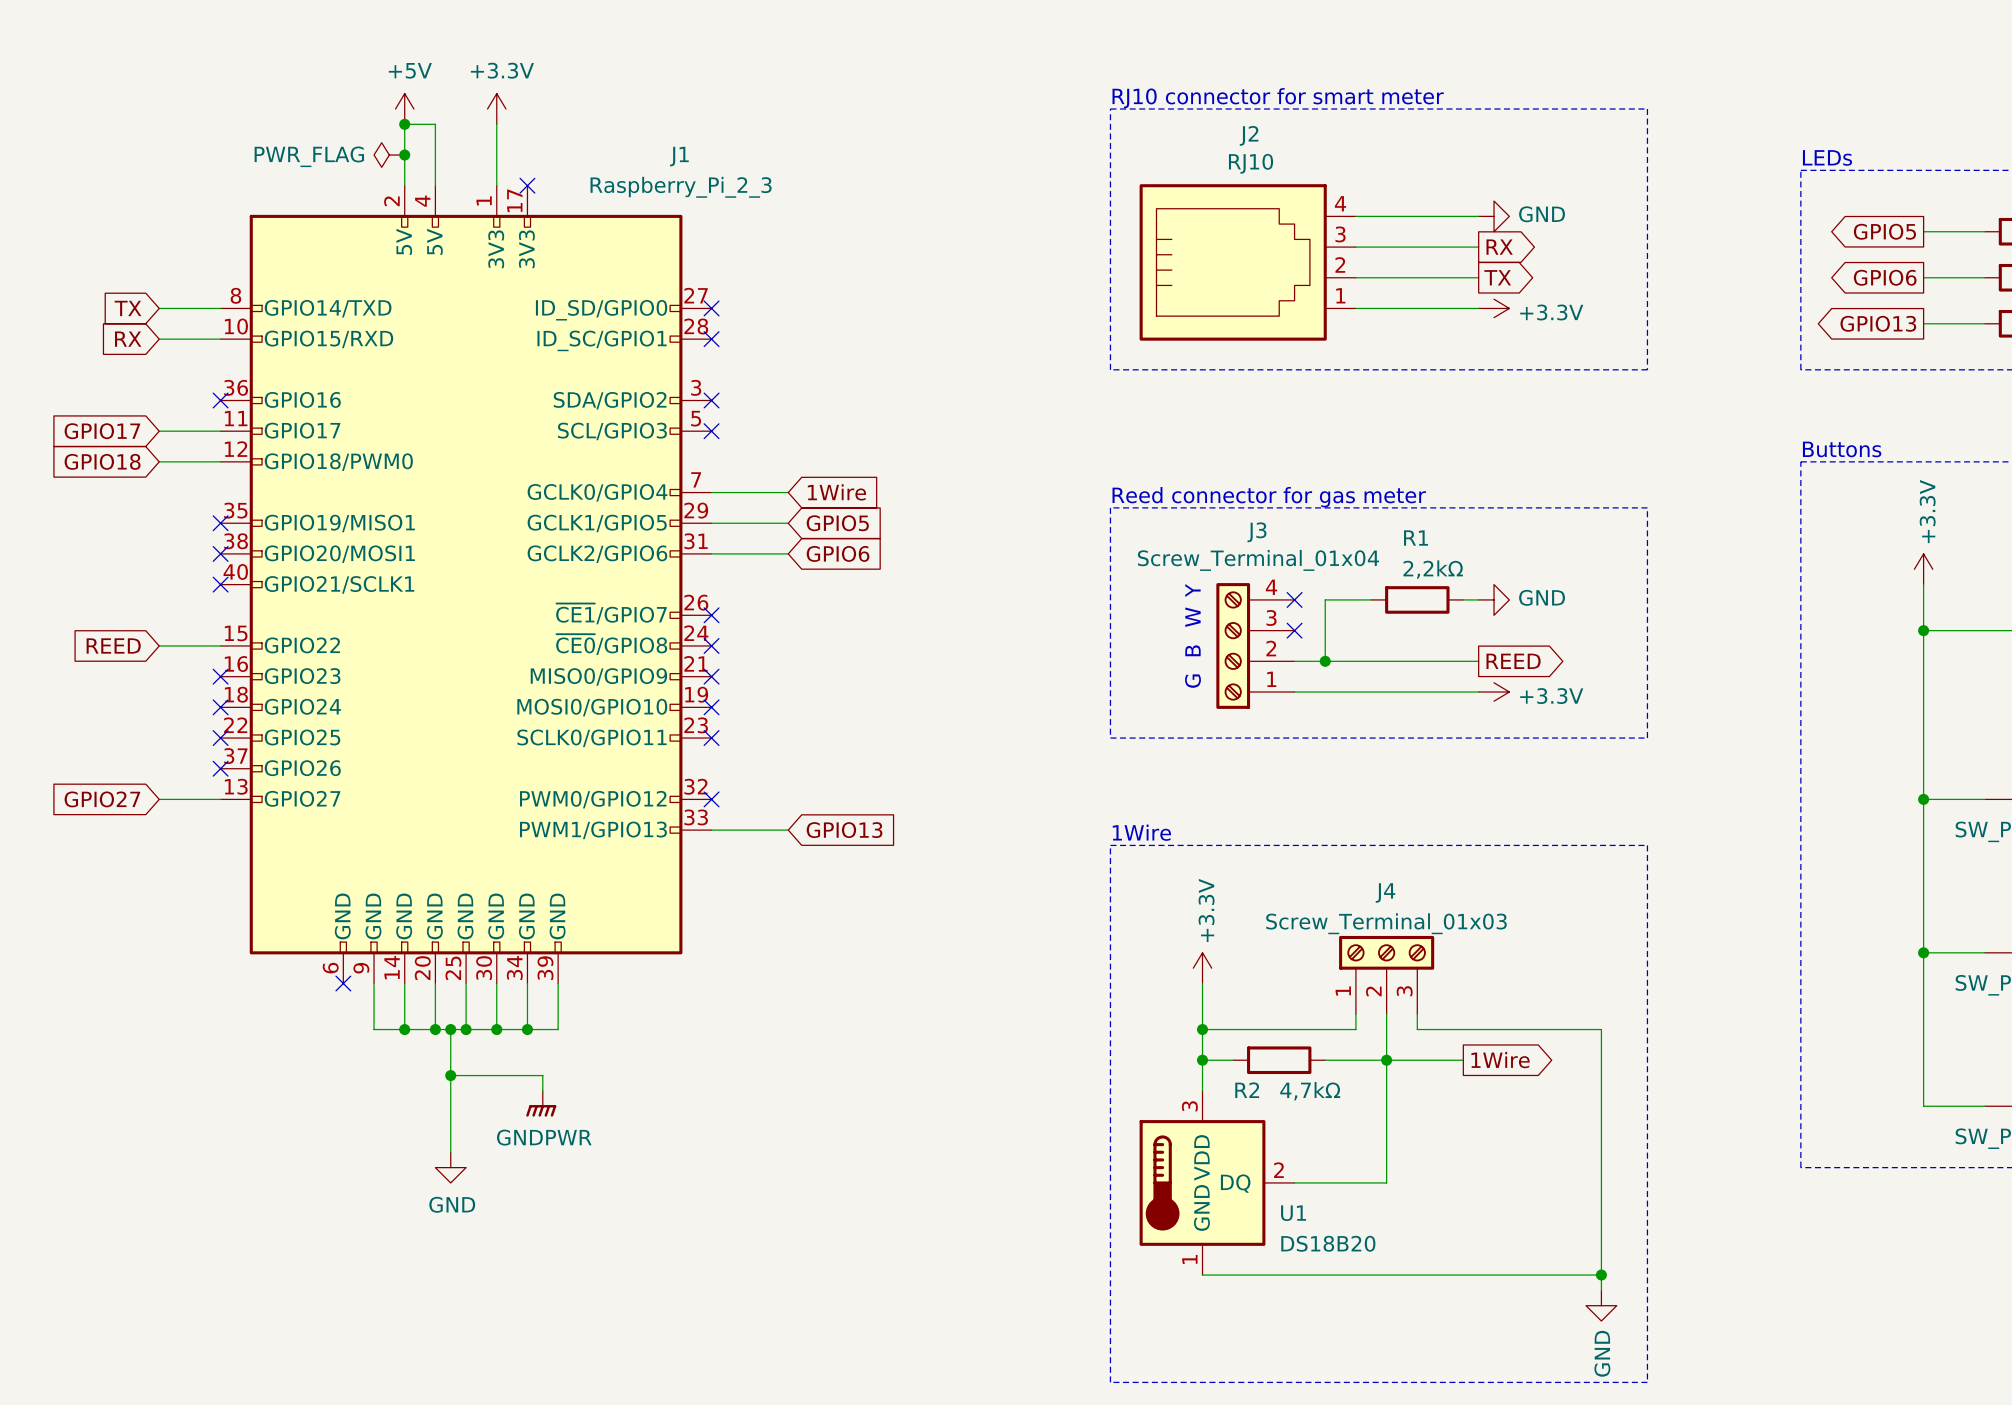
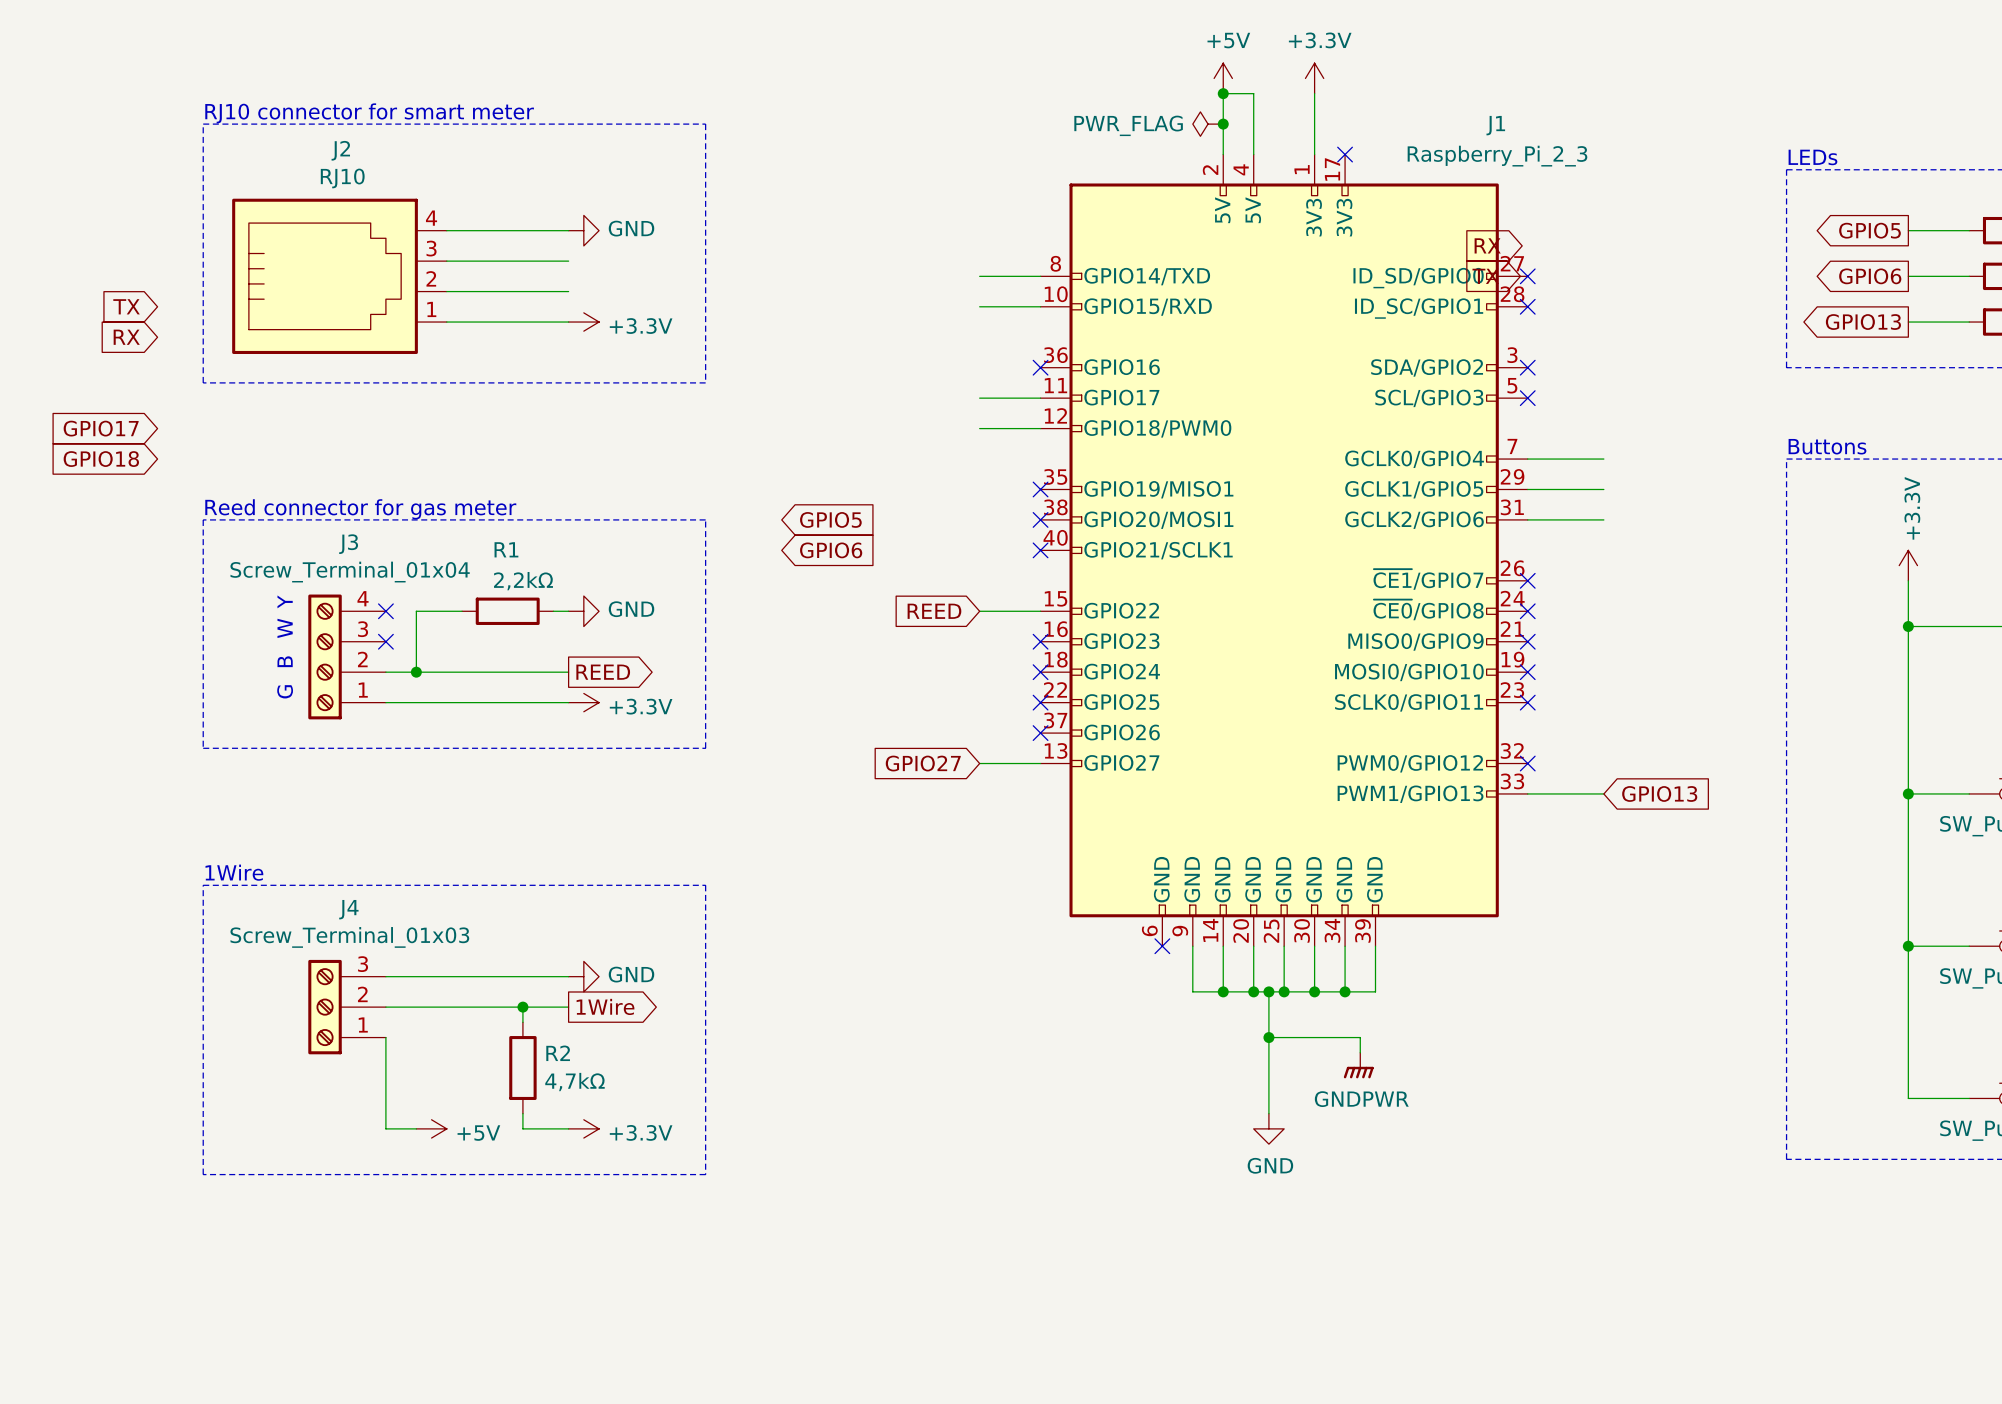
power symbol text position: +3.3V (502, 70) -> +3.3V (641, 326)
power symbol: none -> +5V (1223, 78)
junction: none -> (1223, 93)
wire: none -> (1314, 93) (1314, 154)
text: RJ10 connector for smart meter (1278, 98) -> none
power symbol: +5V (404, 109) -> none
power symbol rotation: 0° (496, 109) -> 90° clockwise (583, 322)
power symbol position: +3.3V (496, 109) -> +3.3V (583, 322)
line: (1110, 109) (1647, 109) (1647, 369) (1110, 369) (1110, 109) -> none
text: none -> RJ10 connector for smart meter (369, 113)
line: none -> (203, 124) (705, 124) (705, 382) (203, 382) (203, 124)
junction: (404, 124) -> none
wire: (496, 124) (496, 185) -> none
power symbol: none -> PWR_FLAG (1208, 124)
junction: none -> (1223, 124)
power symbol: PWR_FLAG (389, 155) -> none
junction: (404, 155) -> none
wire: none -> (1223, 154) (1223, 93) (1253, 93) (1253, 154)
no-connect mark: none -> (1345, 154)
wire: (404, 185) (404, 124) (435, 124) (435, 185) -> none
no-connect mark: (527, 185) -> none
power symbol: GND (1494, 216) -> none
power symbol: none -> GND (583, 230)
J2 position: (1247, 262) -> (339, 276)
wire: none -> (979, 276) (1040, 276)
no-connect mark: none -> (1527, 276)
wire: (159, 308) (220, 308) -> none
no-connect mark: (711, 308) -> none
wire: none -> (979, 306) (1040, 306)
power symbol rotation: 0° (1494, 308) -> 90° counterclockwise (1314, 78)
power symbol position: +3.3V (1494, 308) -> +3.3V (1314, 78)
no-connect mark: none -> (1527, 306)
power symbol text position: +3.3V (1551, 312) -> +3.3V (1320, 40)
wire: (159, 339) (220, 339) -> none
no-connect mark: (711, 339) -> none
no-connect mark: none -> (1040, 367)
no-connect mark: none -> (1527, 367)
no-connect mark: (220, 400) -> none
no-connect mark: (711, 400) -> none
wire: none -> (979, 398) (1040, 398)
no-connect mark: none -> (1527, 398)
wire: (159, 431) (220, 431) -> none
no-connect mark: (711, 431) -> none
wire: none -> (979, 428) (1040, 428)
wire: (159, 461) (220, 461) -> none
wire: none -> (1527, 459) (1603, 459)
wire: (711, 492) (788, 492) -> none
global label: 1Wire (836, 492) -> none
no-connect mark: none -> (1040, 489)
wire: none -> (1527, 489) (1603, 489)
text: Reed connector for gas meter (1269, 497) -> none
line: (1110, 507) (1110, 738) (1647, 738) (1647, 507) (1110, 507) -> none
text: none -> Reed connector for gas meter (360, 509)
line: none -> (203, 519) (203, 748) (705, 748) (705, 519) (203, 519)
no-connect mark: (220, 523) -> none
wire: (711, 523) (788, 523) -> none
no-connect mark: none -> (1040, 519)
wire: none -> (1527, 519) (1603, 519)
no-connect mark: (220, 553) -> none
wire: (711, 553) (788, 553) -> none
no-connect mark: none -> (1040, 550)
no-connect mark: (220, 584) -> none
J1 position: (466, 584) -> (1284, 550)
no-connect mark: none -> (1527, 580)
text: Y (1192, 590) -> none
no-connect mark: (1294, 599) -> none
R1 position: (1417, 599) -> (507, 611)
power symbol: GND (1494, 599) -> none
text: none -> Y (285, 601)
no-connect mark: none -> (385, 611)
power symbol: none -> GND (583, 611)
no-connect mark: (711, 615) -> none
global label: none -> REED (934, 611)
wire: none -> (979, 611) (1040, 611)
no-connect mark: none -> (1527, 611)
text: W (1192, 617) -> none
no-connect mark: (1294, 630) -> none
text: none -> W (285, 628)
global label: REED (113, 645) -> none
wire: (159, 645) (220, 645) -> none
no-connect mark: none -> (385, 641)
no-connect mark: (711, 645) -> none
no-connect mark: none -> (1040, 641)
J3 position: (1255, 645) -> (347, 656)
no-connect mark: none -> (1527, 641)
text: B (1192, 650) -> none
junction: (1325, 661) -> none
global label: REED (1513, 661) -> none
text: none -> B (285, 661)
no-connect mark: (220, 676) -> none
junction: none -> (416, 672)
global label: none -> REED (603, 672)
no-connect mark: (711, 676) -> none
no-connect mark: none -> (1040, 672)
no-connect mark: none -> (1527, 672)
text: G (1192, 681) -> none
power symbol: +3.3V (1494, 692) -> none
text: none -> G (285, 691)
no-connect mark: (220, 707) -> none
power symbol: none -> +3.3V (583, 702)
no-connect mark: (711, 707) -> none
no-connect mark: none -> (1040, 702)
no-connect mark: none -> (1527, 702)
no-connect mark: (220, 738) -> none
no-connect mark: (711, 738) -> none
no-connect mark: none -> (1040, 733)
no-connect mark: (220, 768) -> none
global label: none -> GPIO27 (923, 763)
wire: none -> (979, 763) (1040, 763)
no-connect mark: none -> (1527, 763)
global label: GPIO27 (102, 799) -> none
wire: (159, 799) (220, 799) -> none
no-connect mark: (711, 799) -> none
wire: none -> (1527, 793) (1603, 793)
global label: none -> GPIO13 (1659, 793)
wire: (711, 830) (788, 830) -> none
global label: GPIO13 (844, 830) -> none
text: 1Wire (1141, 832) -> none
line: (1110, 845) (1110, 1382) (1647, 1382) (1647, 845) (1110, 845) -> none
text: none -> 1Wire (234, 872)
line: none -> (203, 885) (203, 1174) (705, 1174) (705, 885) (203, 885)
no-connect mark: none -> (1162, 946)
wire: none -> (1223, 946) (1223, 991)
wire: none -> (1253, 946) (1253, 991)
wire: none -> (1284, 946) (1284, 991)
wire: none -> (1314, 946) (1314, 991)
J4 rotation: 0° (1386, 952) -> 90° counterclockwise (325, 1007)
power symbol: +3.3V (1202, 968) -> none
J4 position: (1386, 975) -> (347, 1007)
no-connect mark: (343, 983) -> none
wire: (374, 983) (374, 1029) (558, 1029) (558, 983) -> none
wire: none -> (385, 976) (568, 976)
wire: (404, 983) (404, 1029) -> none
wire: (435, 983) (435, 1029) -> none
wire: (466, 983) (466, 1029) -> none
wire: (496, 983) (496, 1029) -> none
wire: (527, 983) (527, 1014) -> none
wire: (1202, 998) (1202, 1090) -> (1192, 991) (1375, 991) (1375, 946)
junction: none -> (1223, 991)
junction: none -> (1253, 991)
wire: none -> (1268, 991) (1268, 1113)
junction: none -> (1268, 991)
junction: none -> (1284, 991)
junction: none -> (1314, 991)
junction: none -> (1345, 991)
wire: none -> (385, 1007) (568, 1007)
global label: none -> 1Wire (605, 1006)
wire: (1355, 1014) (1355, 1029) (1202, 1029) -> none
wire: (1386, 1014) (1386, 1182) (1294, 1182) -> none
wire: (1417, 1014) (1417, 1029) (1601, 1029) (1601, 1290) -> none
junction: (404, 1029) -> none
junction: (435, 1029) -> none
wire: (450, 1029) (450, 1152) -> none
junction: (450, 1029) -> none
junction: (466, 1029) -> none
junction: (496, 1029) -> none
junction position: (527, 1029) -> (522, 1007)
junction: (1202, 1029) -> none
wire: none -> (385, 1037) (385, 1128) (416, 1128)
wire: none -> (1268, 1037) (1360, 1037) (1360, 1052)
junction: none -> (1268, 1037)
wire: (1202, 1060) (1233, 1060) -> none
junction: (1202, 1060) -> none
R2 rotation: 0° (1279, 1060) -> 90° clockwise (522, 1068)
R2 position: (1279, 1060) -> (522, 1068)
wire: (1325, 1060) (1463, 1060) -> none
junction: (1386, 1060) -> none
global label: 1Wire (1500, 1060) -> none
power symbol: none -> GNDPWR (1358, 1065)
wire: (450, 1075) (542, 1075) (542, 1090) -> none
junction: (450, 1075) -> none
R2 name position: R2 (1247, 1090) -> R2 (558, 1053)
R2 value position: 4,7kΩ (1310, 1091) -> 4,7kΩ (574, 1082)
power symbol: GNDPWR (541, 1103) -> none
wire: none -> (522, 1113) (522, 1128) (568, 1128)
power symbol: none -> +5V (431, 1128)
power symbol: none -> +3.3V (583, 1128)
power symbol: none -> GND (1268, 1128)
power symbol rotation: 0° (450, 1167) -> 90° counterclockwise (583, 976)
power symbol position: GND (450, 1167) -> GND (583, 976)
U1: DS18B20 (1217, 1182) -> none
wire: (1202, 1275) (1601, 1275) -> none
junction: (1601, 1275) -> none
power symbol: GND (1601, 1305) -> none

